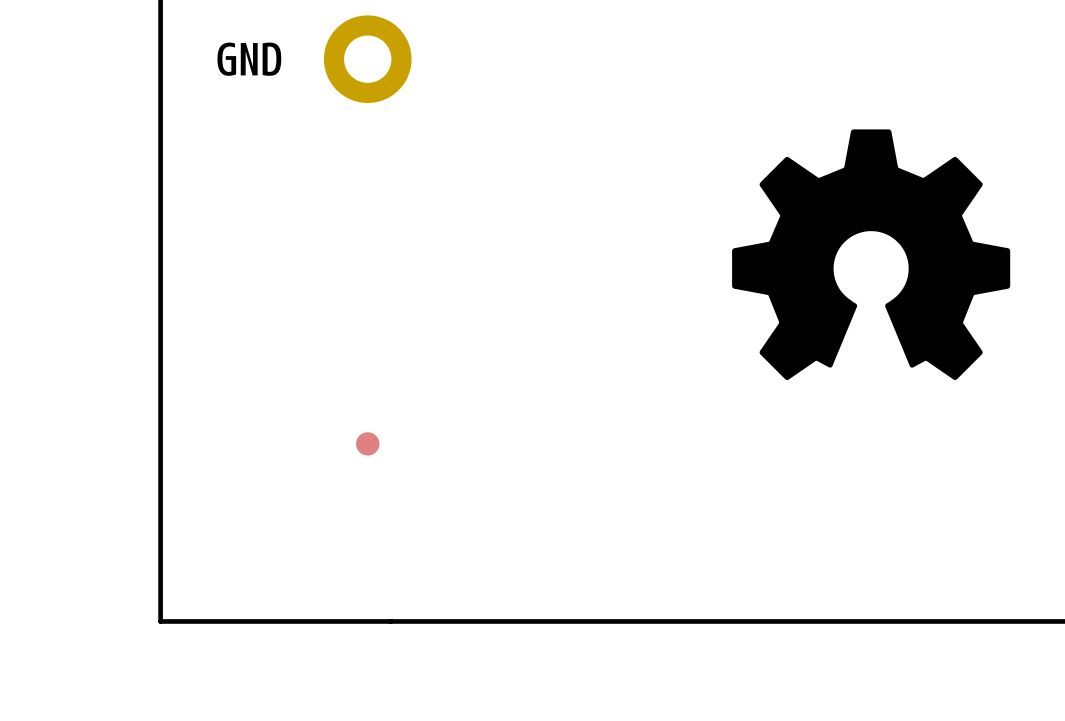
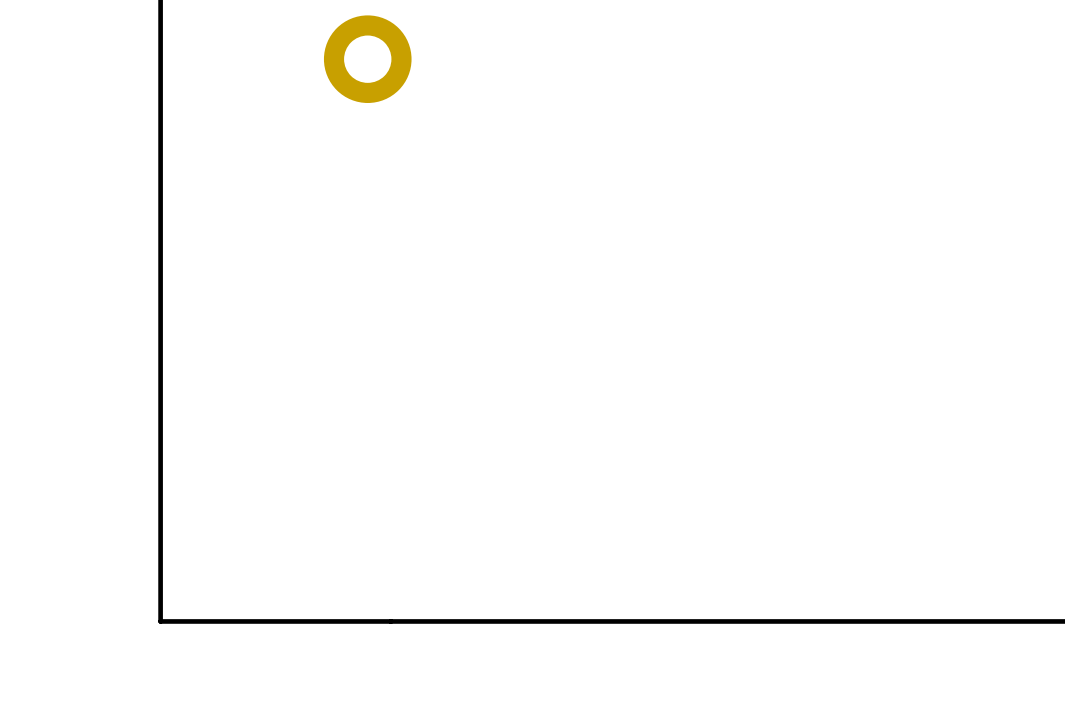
drawing: [217, 42, 282, 76] -> none
drawing: [732, 129, 1011, 380] -> none
part: (367, 443) -> none

